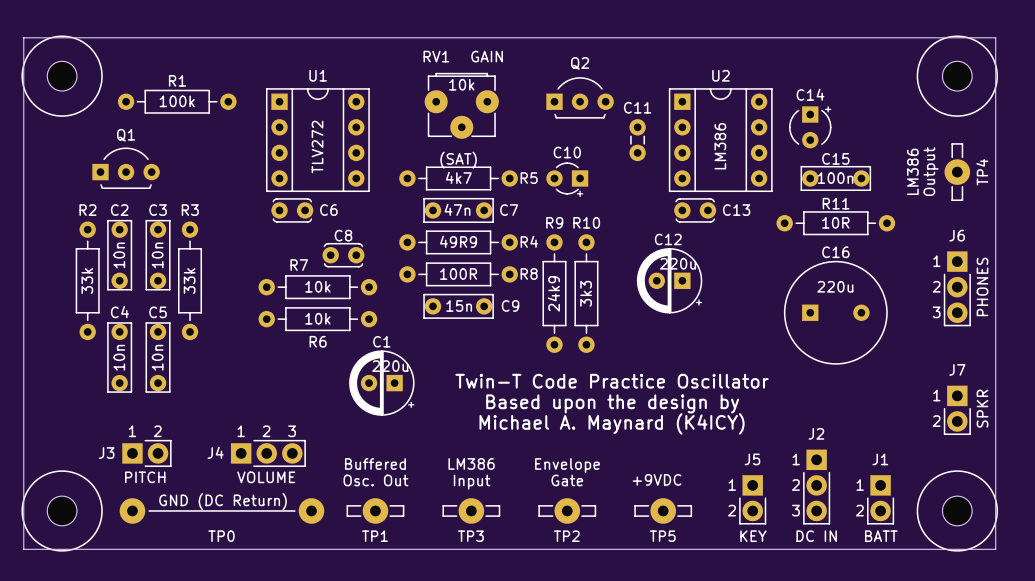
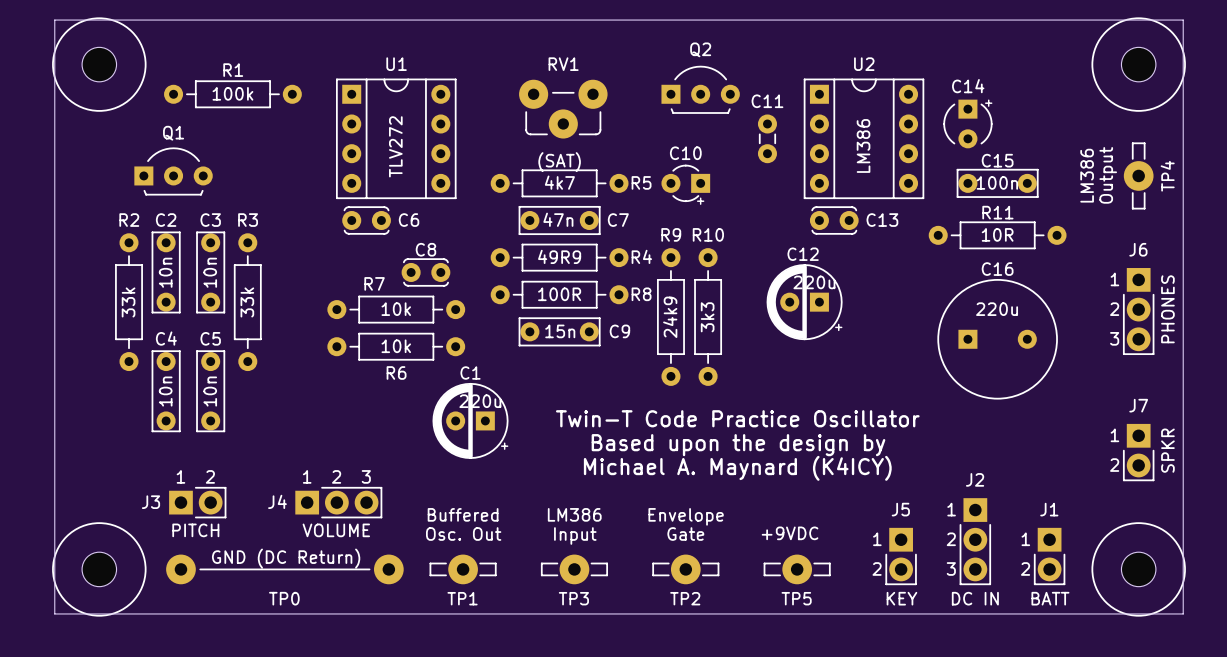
RV1 name position: RV1 (436, 56) -> RV1 (563, 64)
RV1 footprint: [424, 72, 499, 139] -> [519, 79, 608, 139]
RV1 value: 10k (461, 84) -> none

